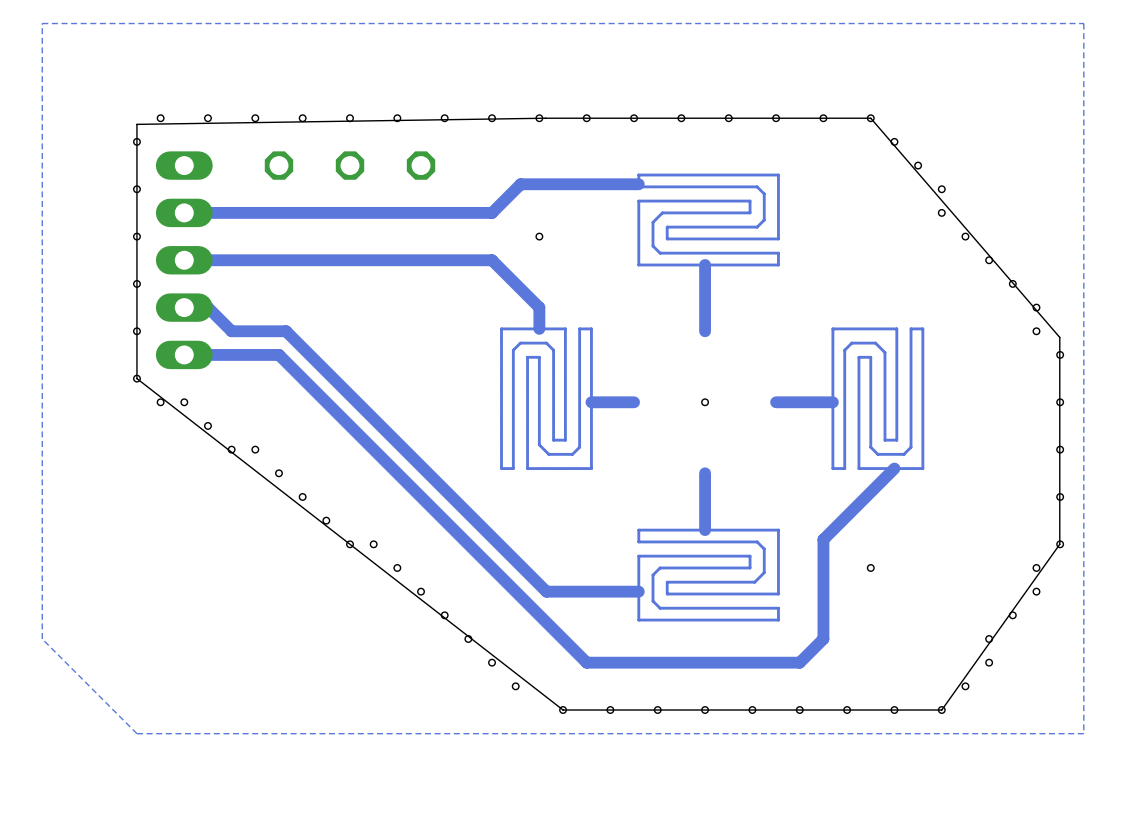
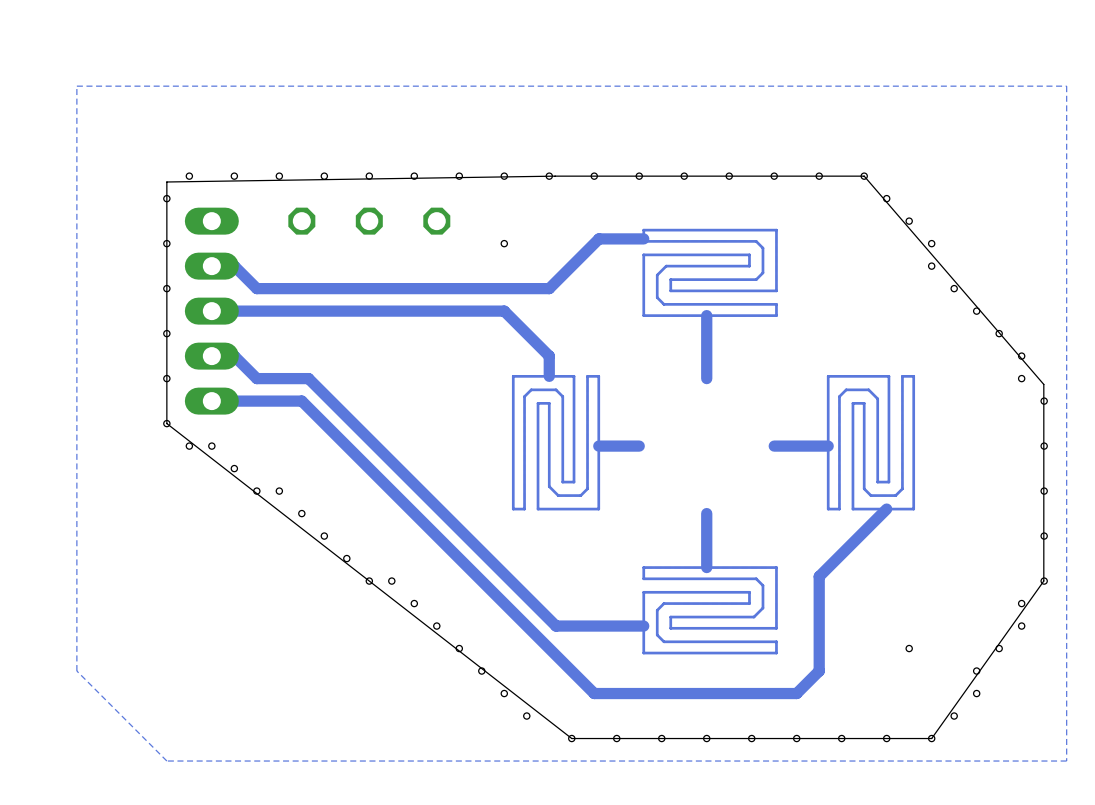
bottom track: (591, 184) (520, 184) (492, 212) (207, 212) -> (598, 238) (549, 288) (256, 288) (234, 266)
hole position: (539, 236) -> (504, 243)
hole: (705, 402) -> none
hole position: (870, 567) -> (909, 648)

